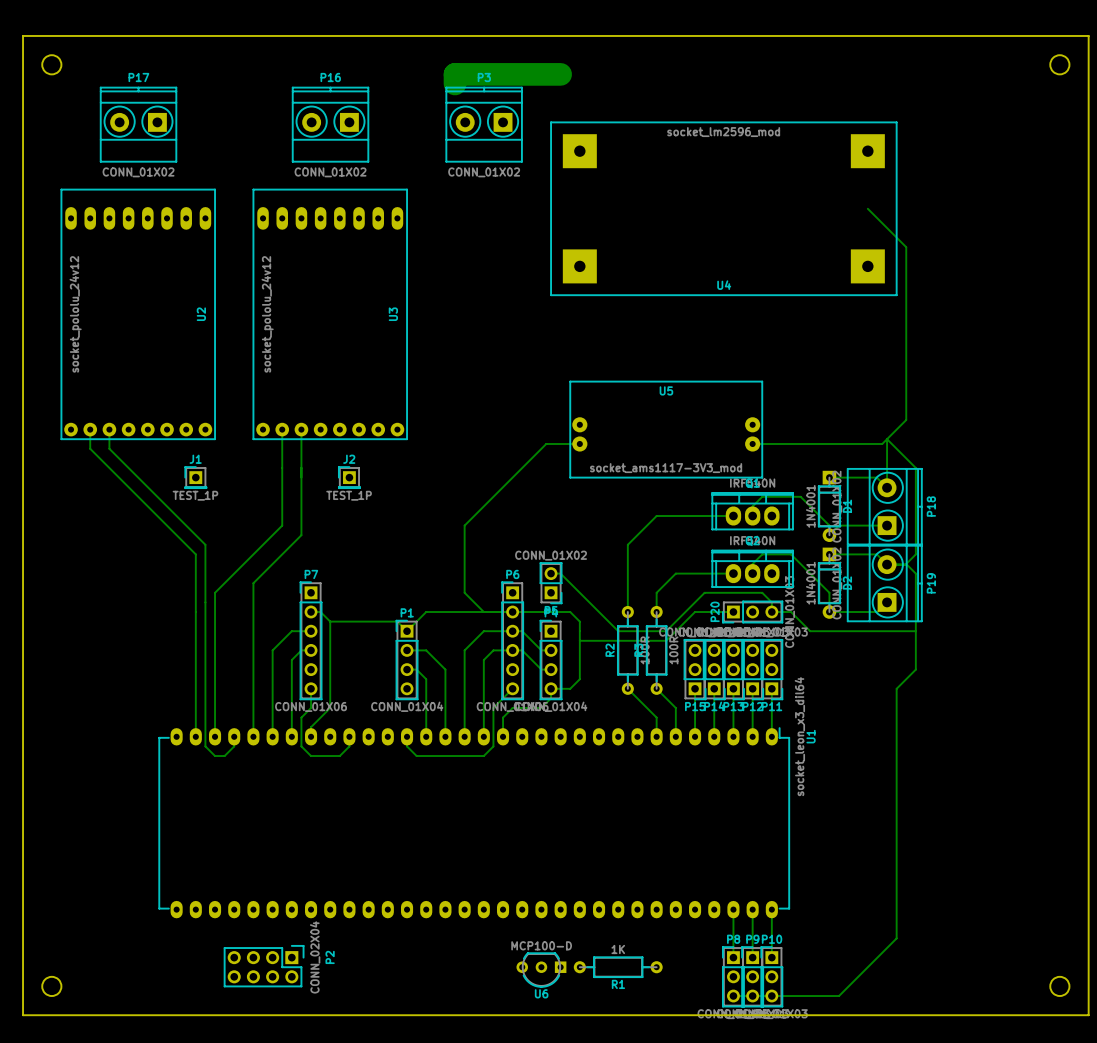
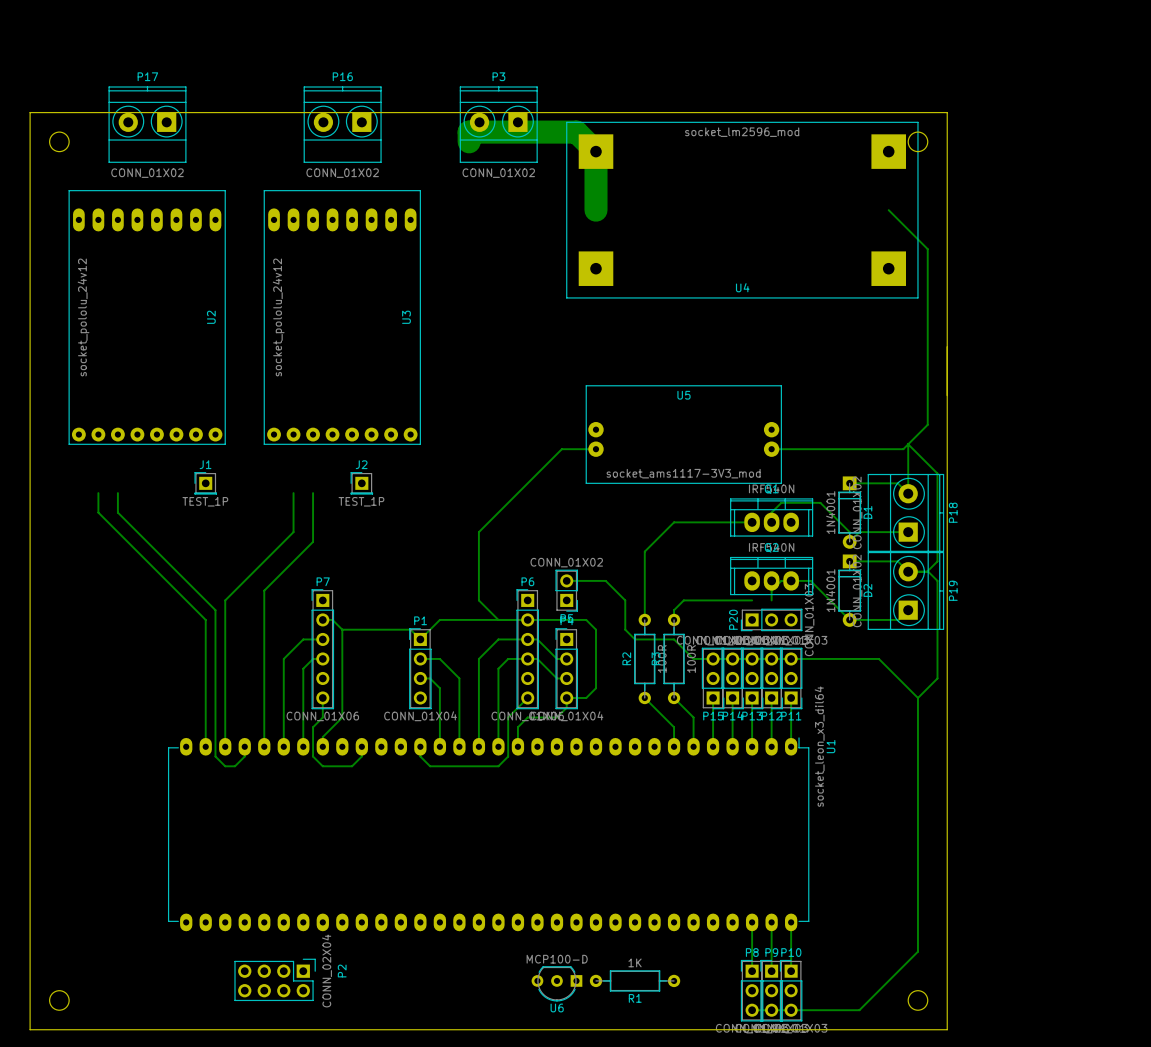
round board edge position: (51, 64) -> (59, 141)
round board edge position: (1059, 64) -> (917, 141)
bottom track: (560, 74) (455, 74) (455, 83) -> none
board edge: (23, 112) (23, 35) (1088, 35) (1088, 1015) (925, 1015) -> (30, 112) (947, 112) (947, 1029)
bottom track: none -> (469, 141) (469, 132) (576, 132) (596, 151) (596, 210)
bottom track: (90, 429) (90, 448) (195, 554) (195, 612) -> (98, 493) (98, 512) (205, 619)
bottom track: (109, 429) (109, 448) (205, 544) (205, 602) -> (117, 493) (117, 512) (215, 610)
bottom track: (282, 429) (282, 487) -> none
bottom track: (301, 429) (301, 487) -> none
bottom track: (560, 573) (608, 621) -> (576, 580) (605, 580) (625, 600) (625, 629)
bottom track: (733, 573) (675, 573) (656, 592) (656, 602) -> none
bottom track: (752, 573) (752, 564) (762, 554) (791, 554) (829, 592) (829, 612) -> (771, 600) (771, 590) (781, 580) (810, 580) (849, 619)
bottom track: (704, 592) (666, 631) (656, 631) -> (722, 600) (683, 600) (674, 610)
bottom track: (733, 592) (762, 592) (771, 602) (771, 612) (791, 612) (810, 631) (915, 631) -> none
bottom track: (733, 612) (695, 612) (666, 640) (579, 640) -> none
bottom track: none -> (674, 639) (693, 658) (878, 658) (917, 697)
round board edge position: (1059, 986) -> (917, 1000)

